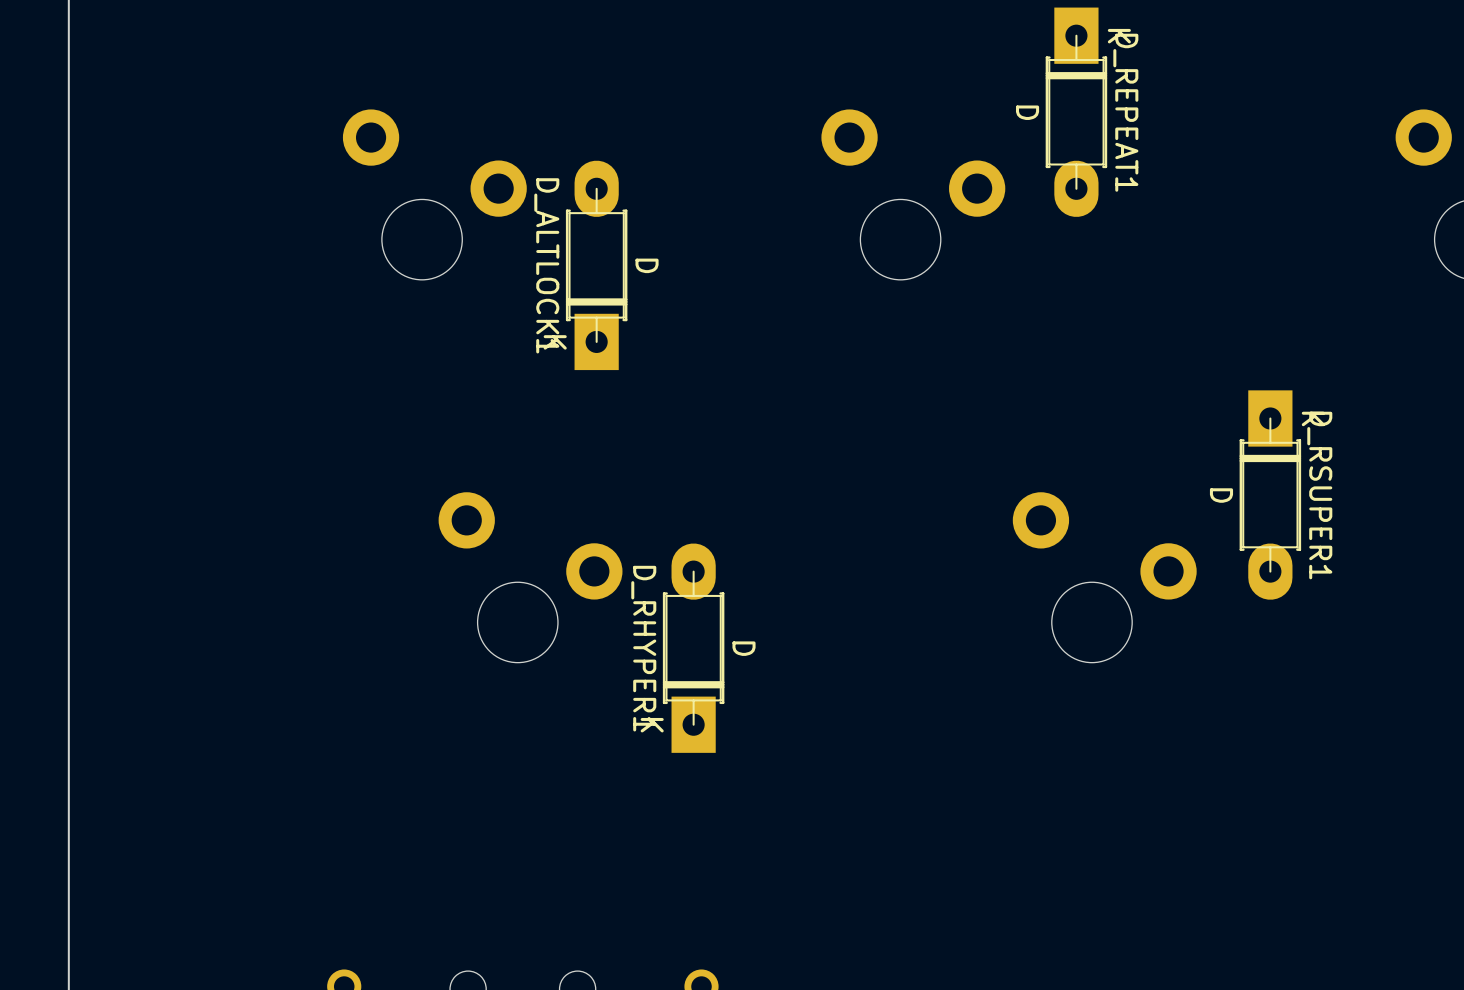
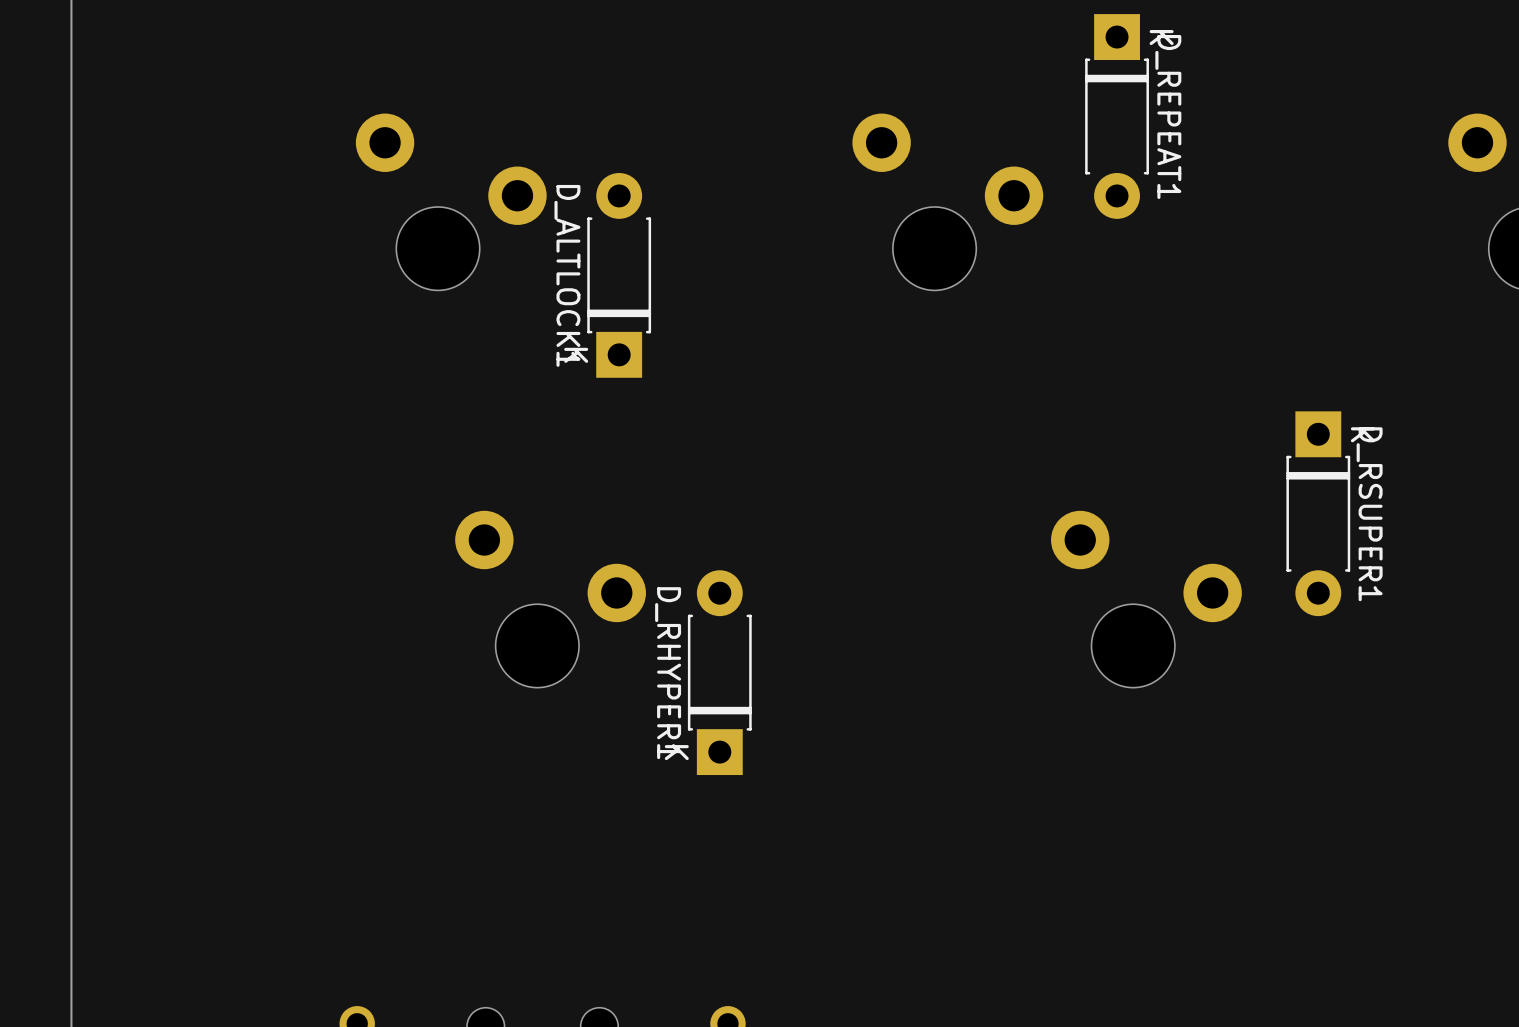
D_REPEAT1 footprint: [1045, 7, 1108, 217] -> [1085, 14, 1149, 219]
D_REPEAT1 value: D (1027, 112) -> none
D_ALTLOCK1 footprint: [565, 160, 628, 371] -> [587, 173, 652, 378]
D_ALTLOCK1 value: D (647, 265) -> none
D_RSUPER1 footprint: [1239, 390, 1302, 600] -> [1286, 411, 1351, 617]
D_RSUPER1 value: D (1221, 495) -> none
D_RHYPER1 footprint: [662, 543, 725, 753] -> [687, 570, 752, 776]
D_RHYPER1 value: D (744, 648) -> none

